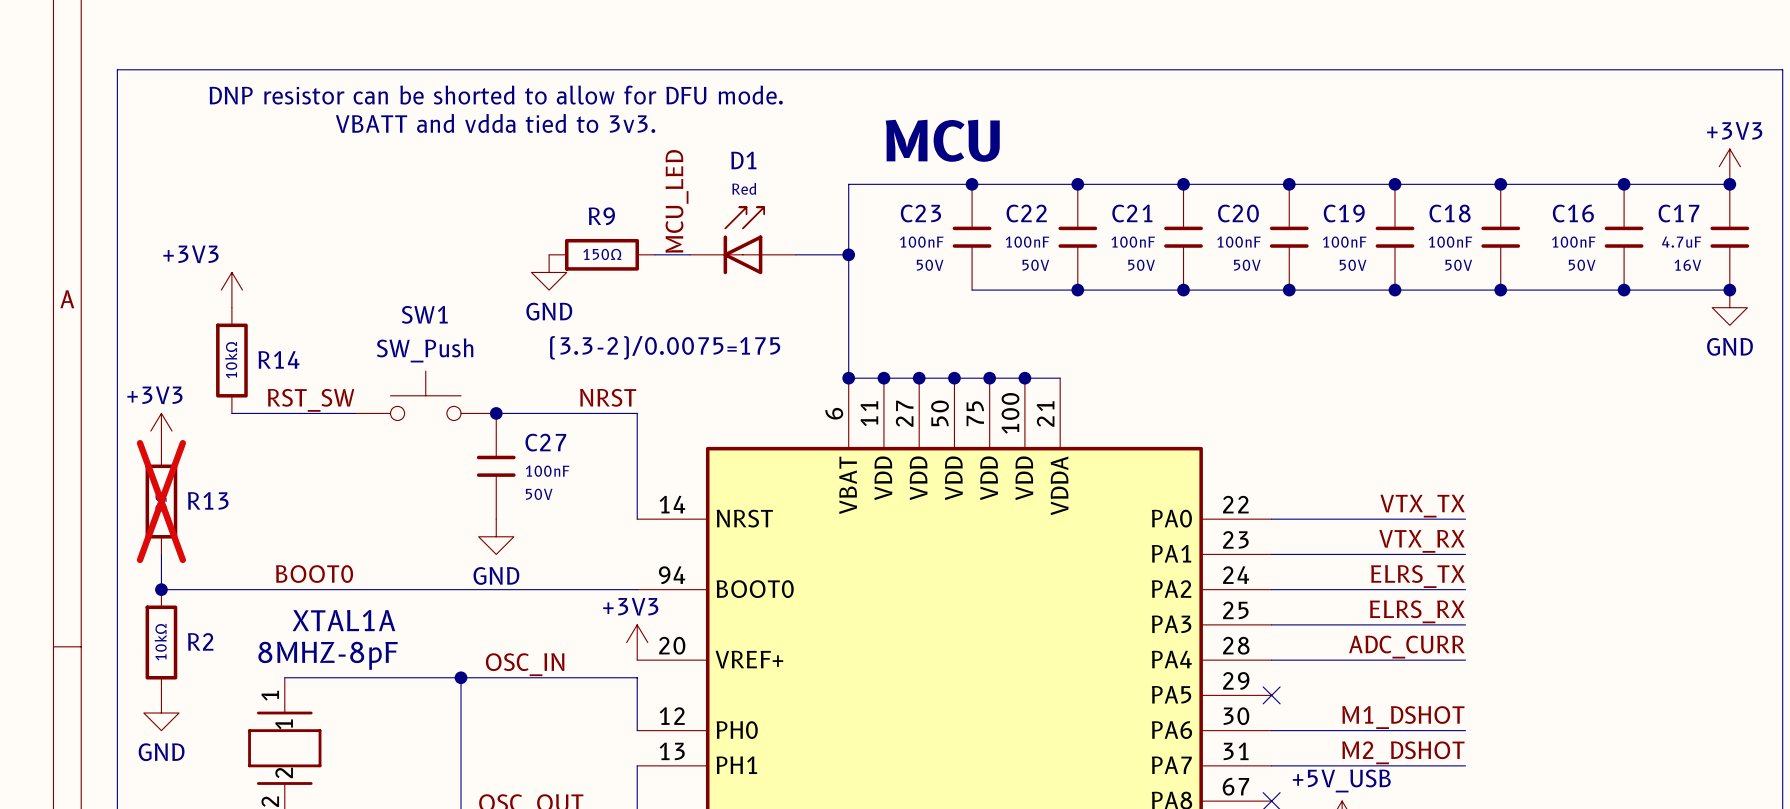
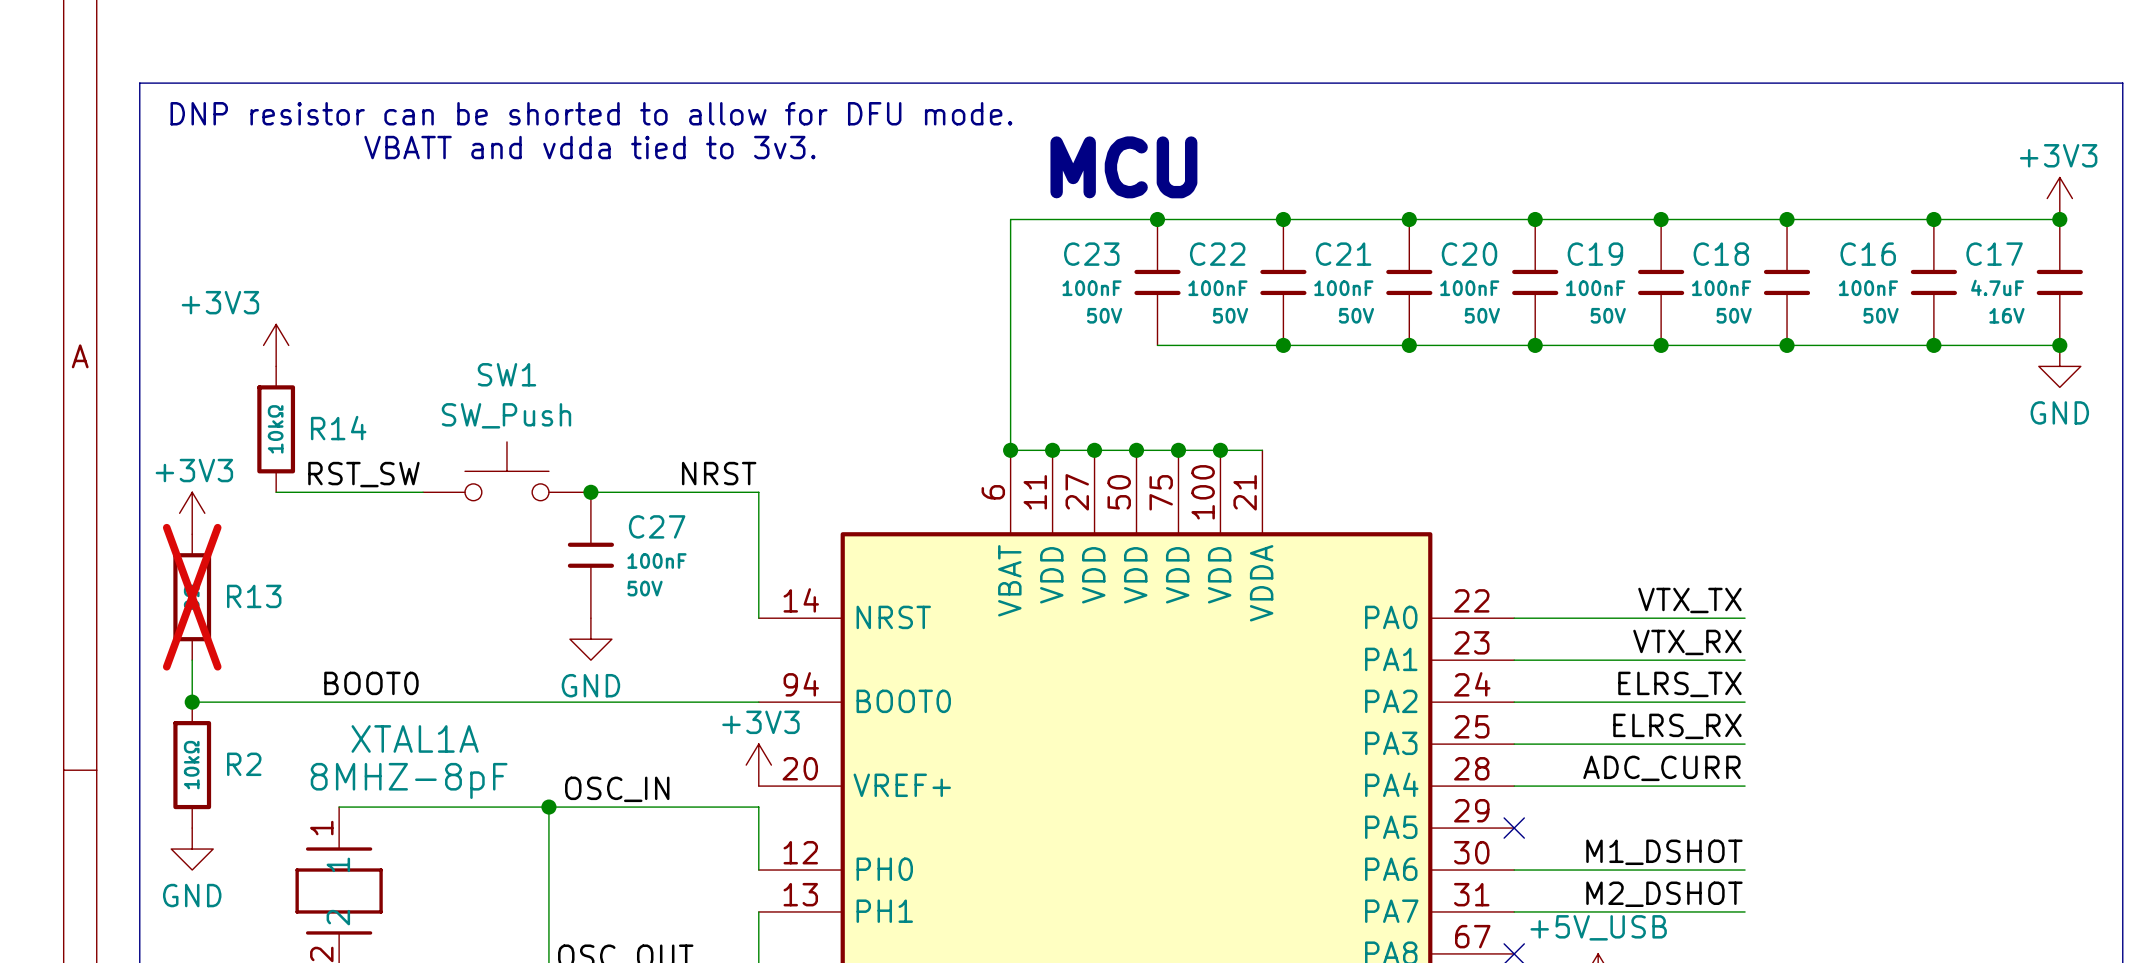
label: MCU_LED (677, 201) -> none
D1: Red (742, 240) -> none
R9: 150Ω (601, 254) -> none
wire: (654, 254) (690, 254) -> none
wire: (795, 254) (848, 254) -> none
junction: (848, 254) -> none
power symbol: GND (549, 272) -> none
text: (3.3-2)/0.0075=175 (665, 347) -> none

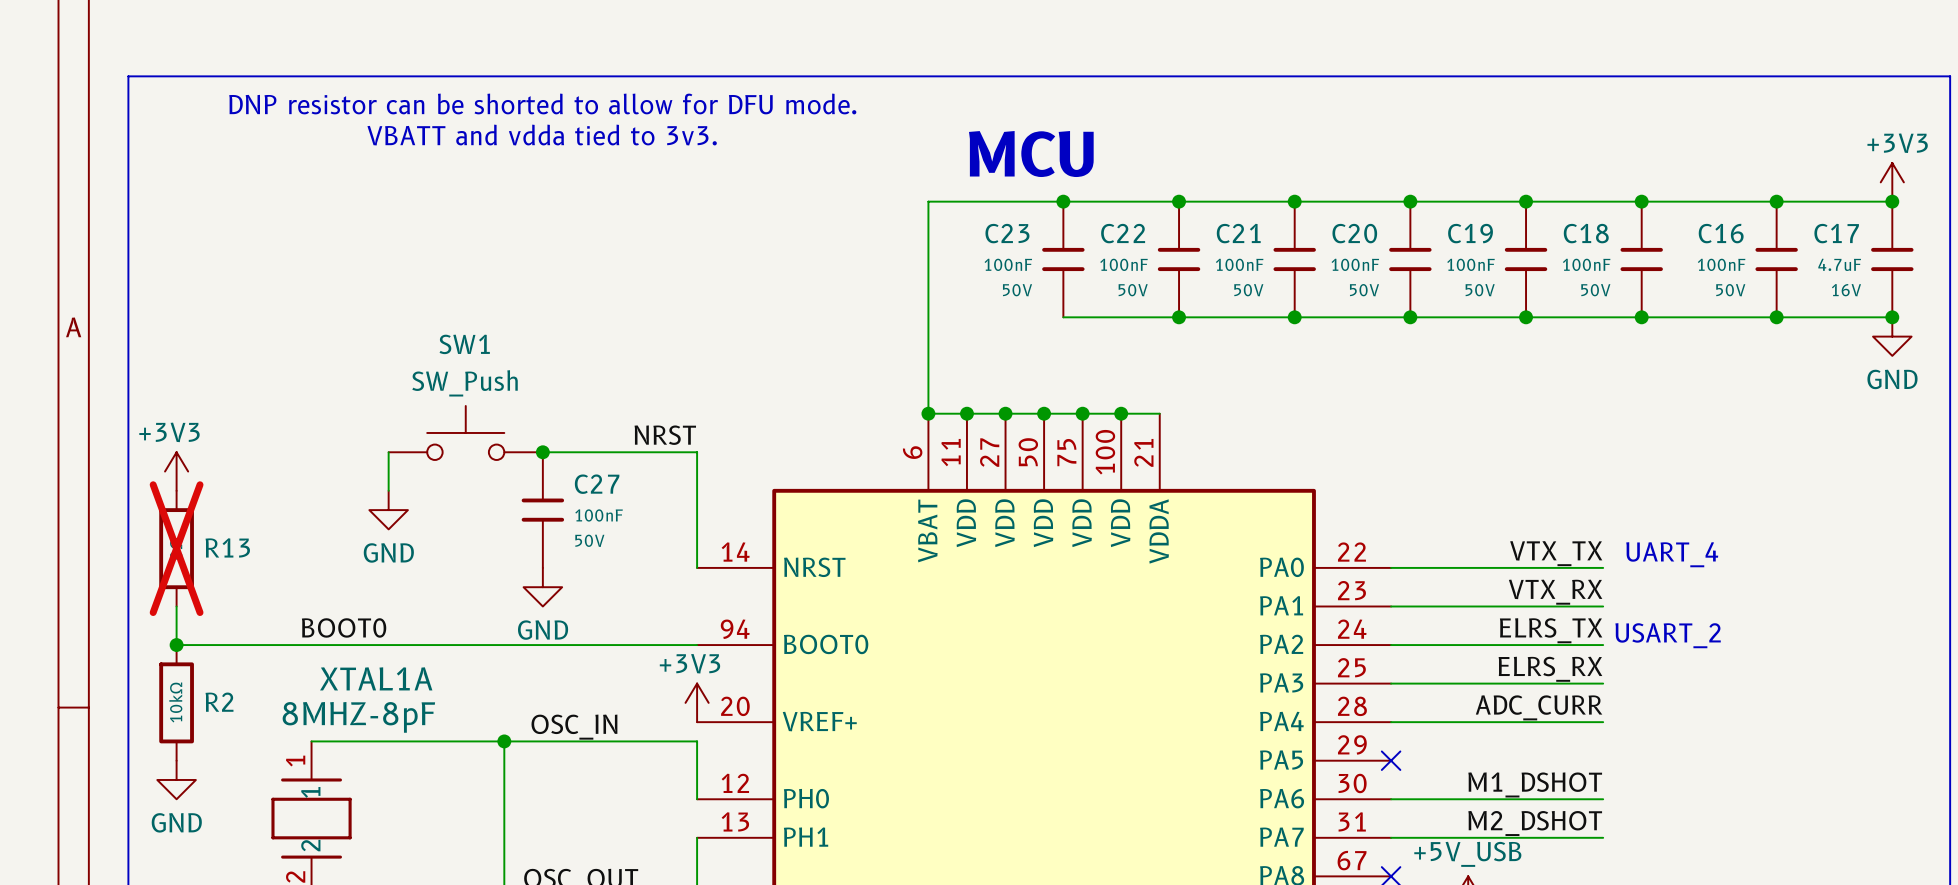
power symbol: +3V3 (276, 345) -> none
R14: 10kΩ (276, 429) -> none
label: RST_SW (363, 474) -> none
wire: (276, 492) (423, 492) -> (388, 490) (388, 452)
power symbol: none -> GND (388, 510)
text: none -> UART_4 (1672, 554)
text: none -> USART_2 (1668, 635)

